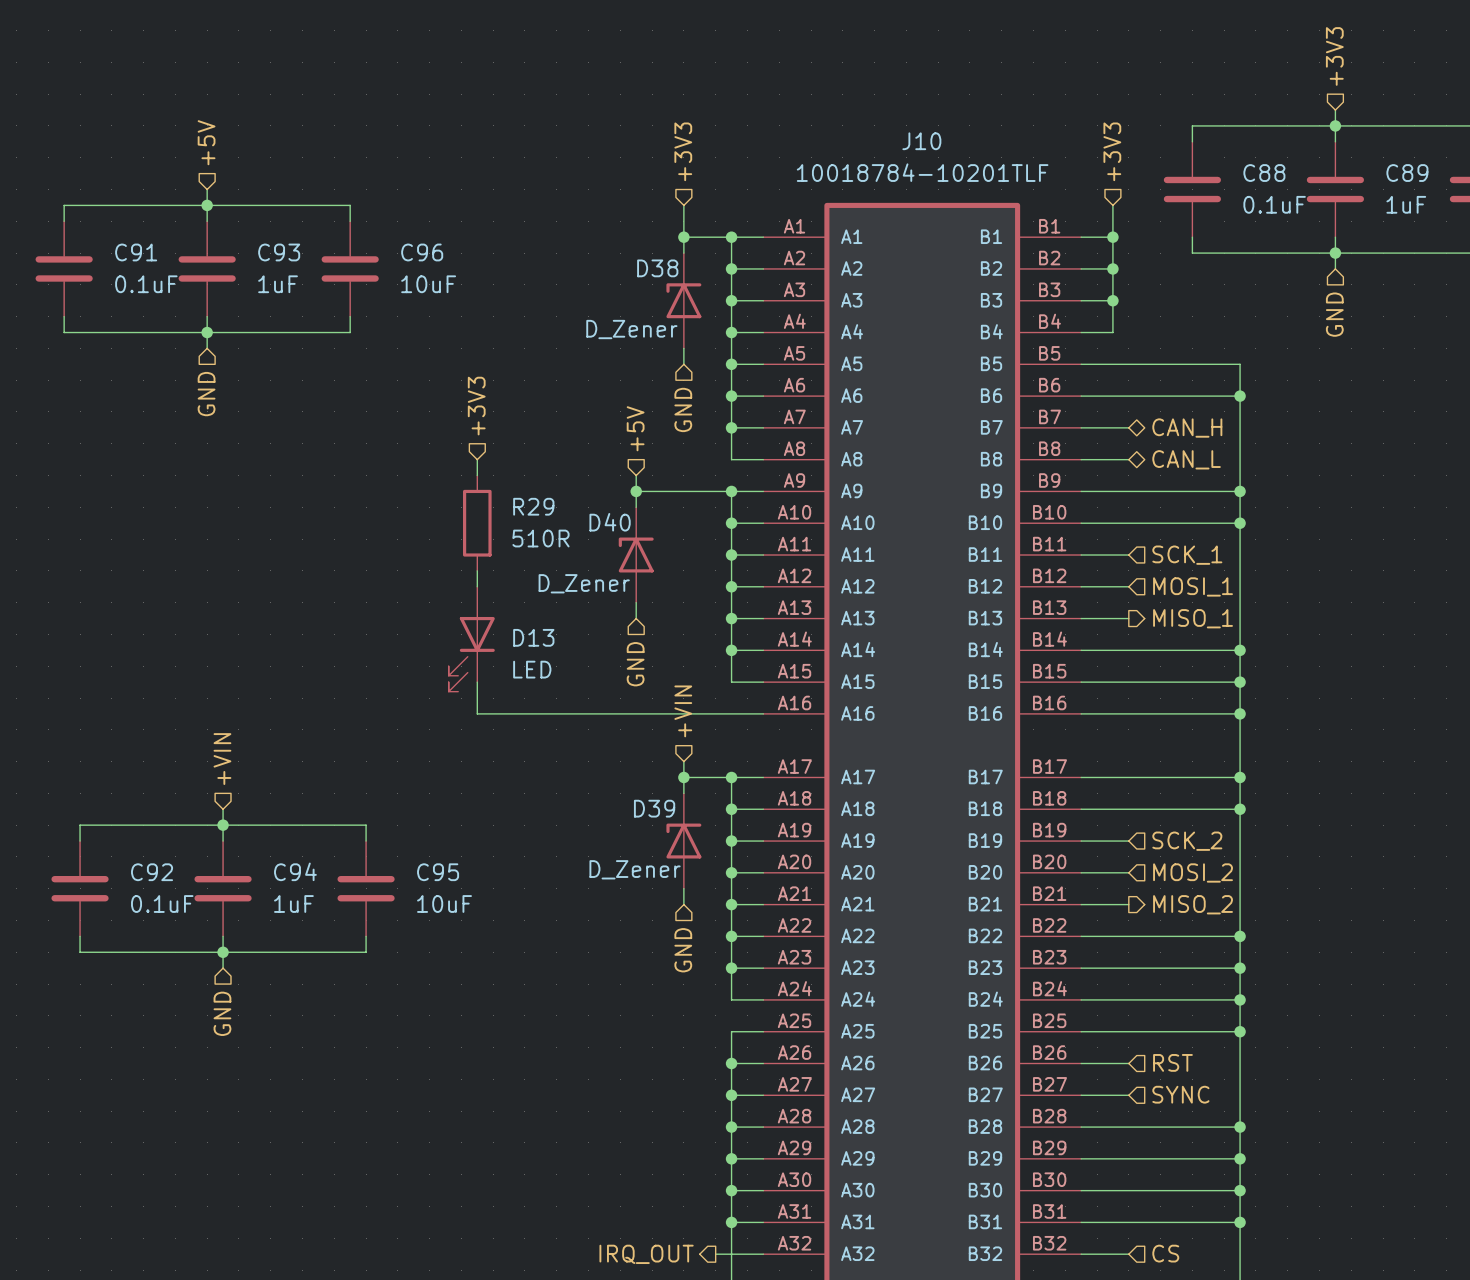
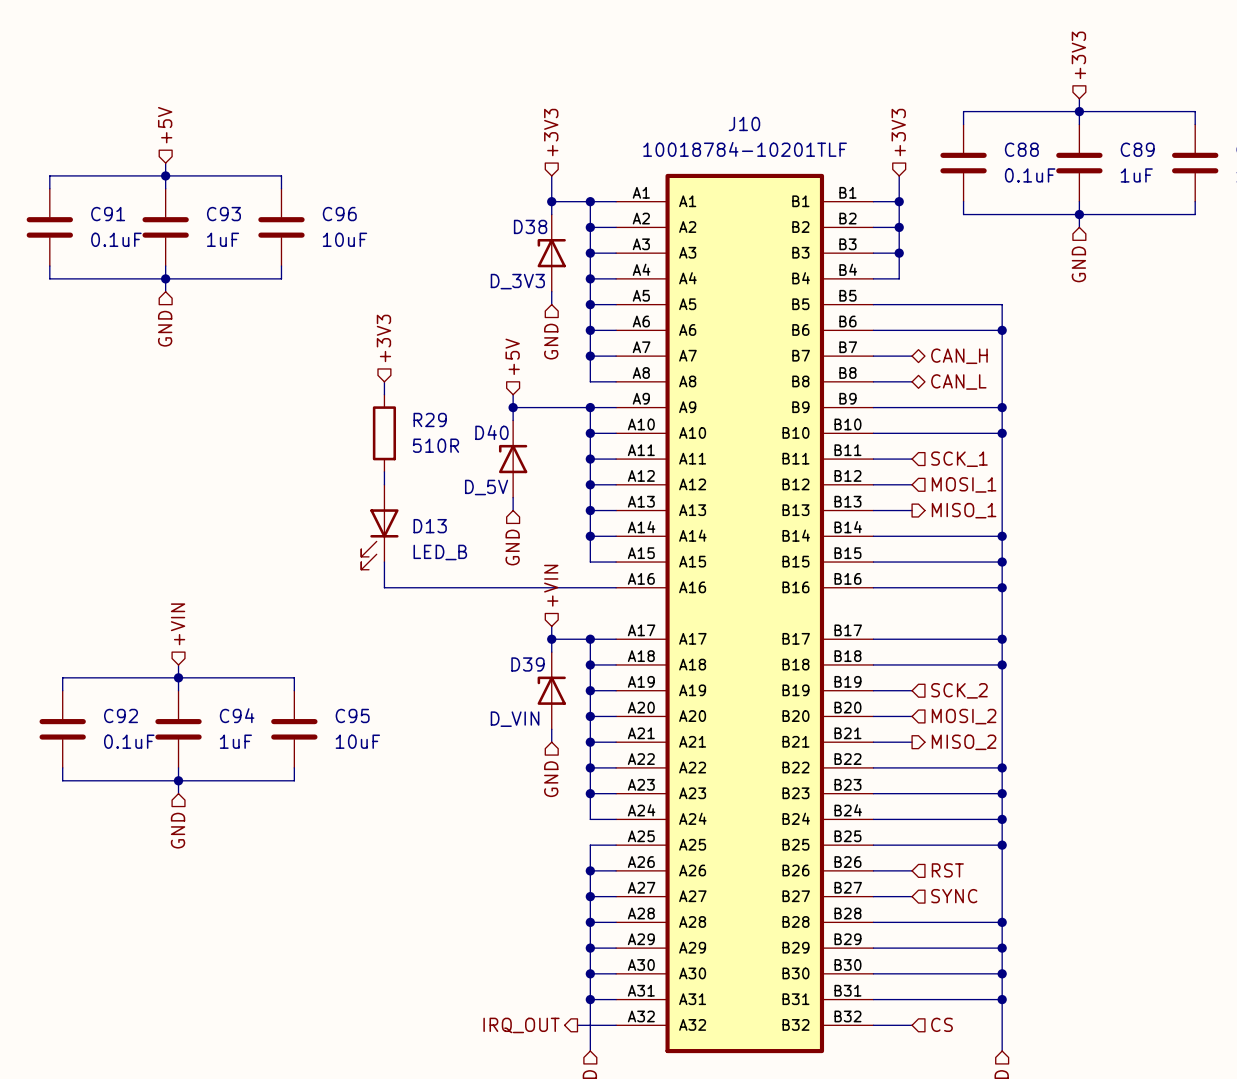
D38 value: D_Zener (631, 329) -> D_3V3 (517, 281)
D40 value: D_Zener (584, 583) -> D_5V (486, 487)
D13 value: LED (532, 669) -> LED_B (440, 552)
D39 value: D_Zener (635, 869) -> D_VIN (515, 719)

